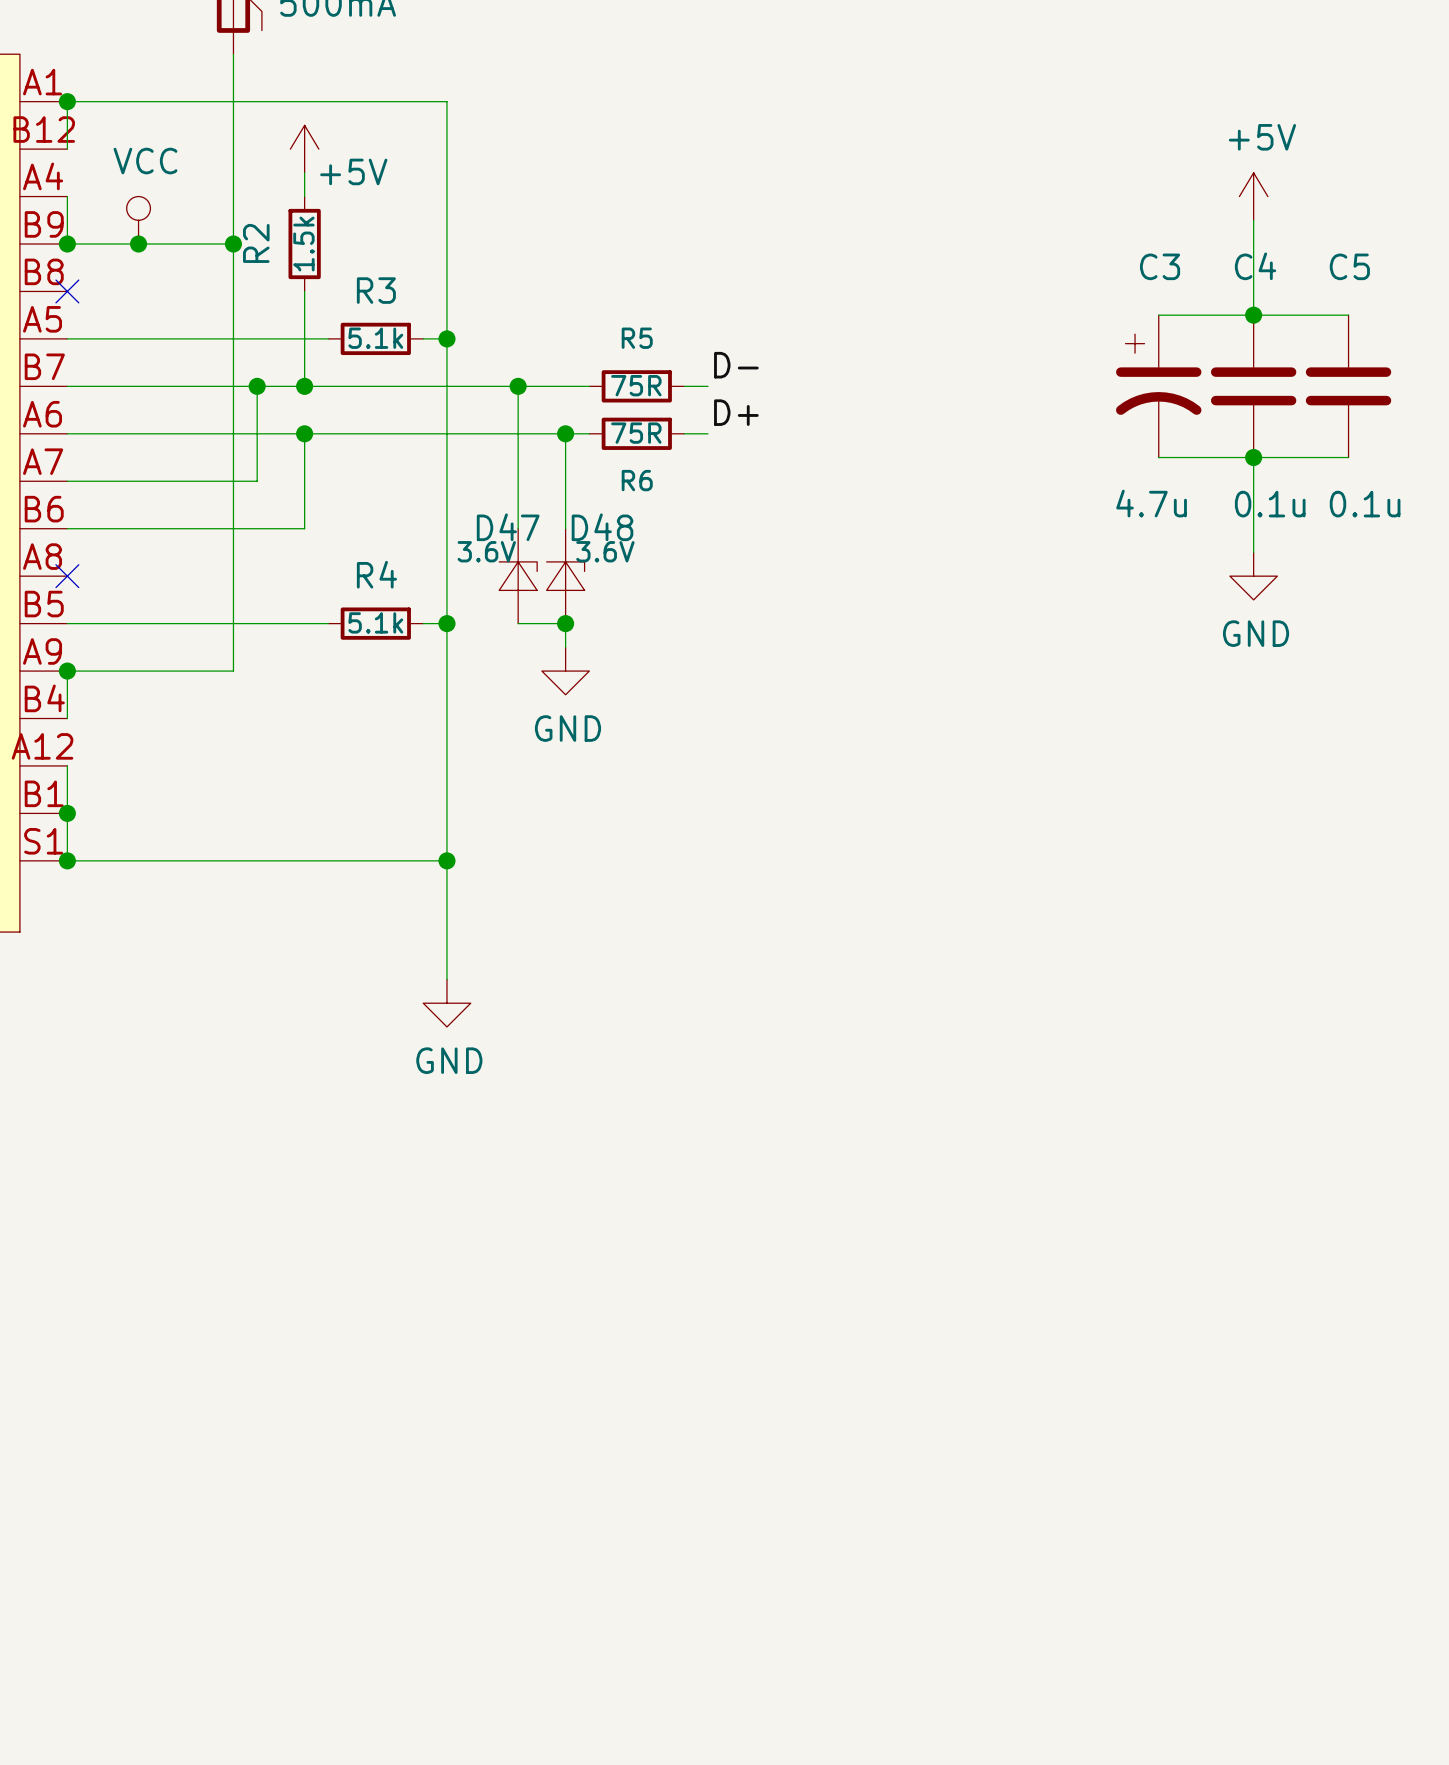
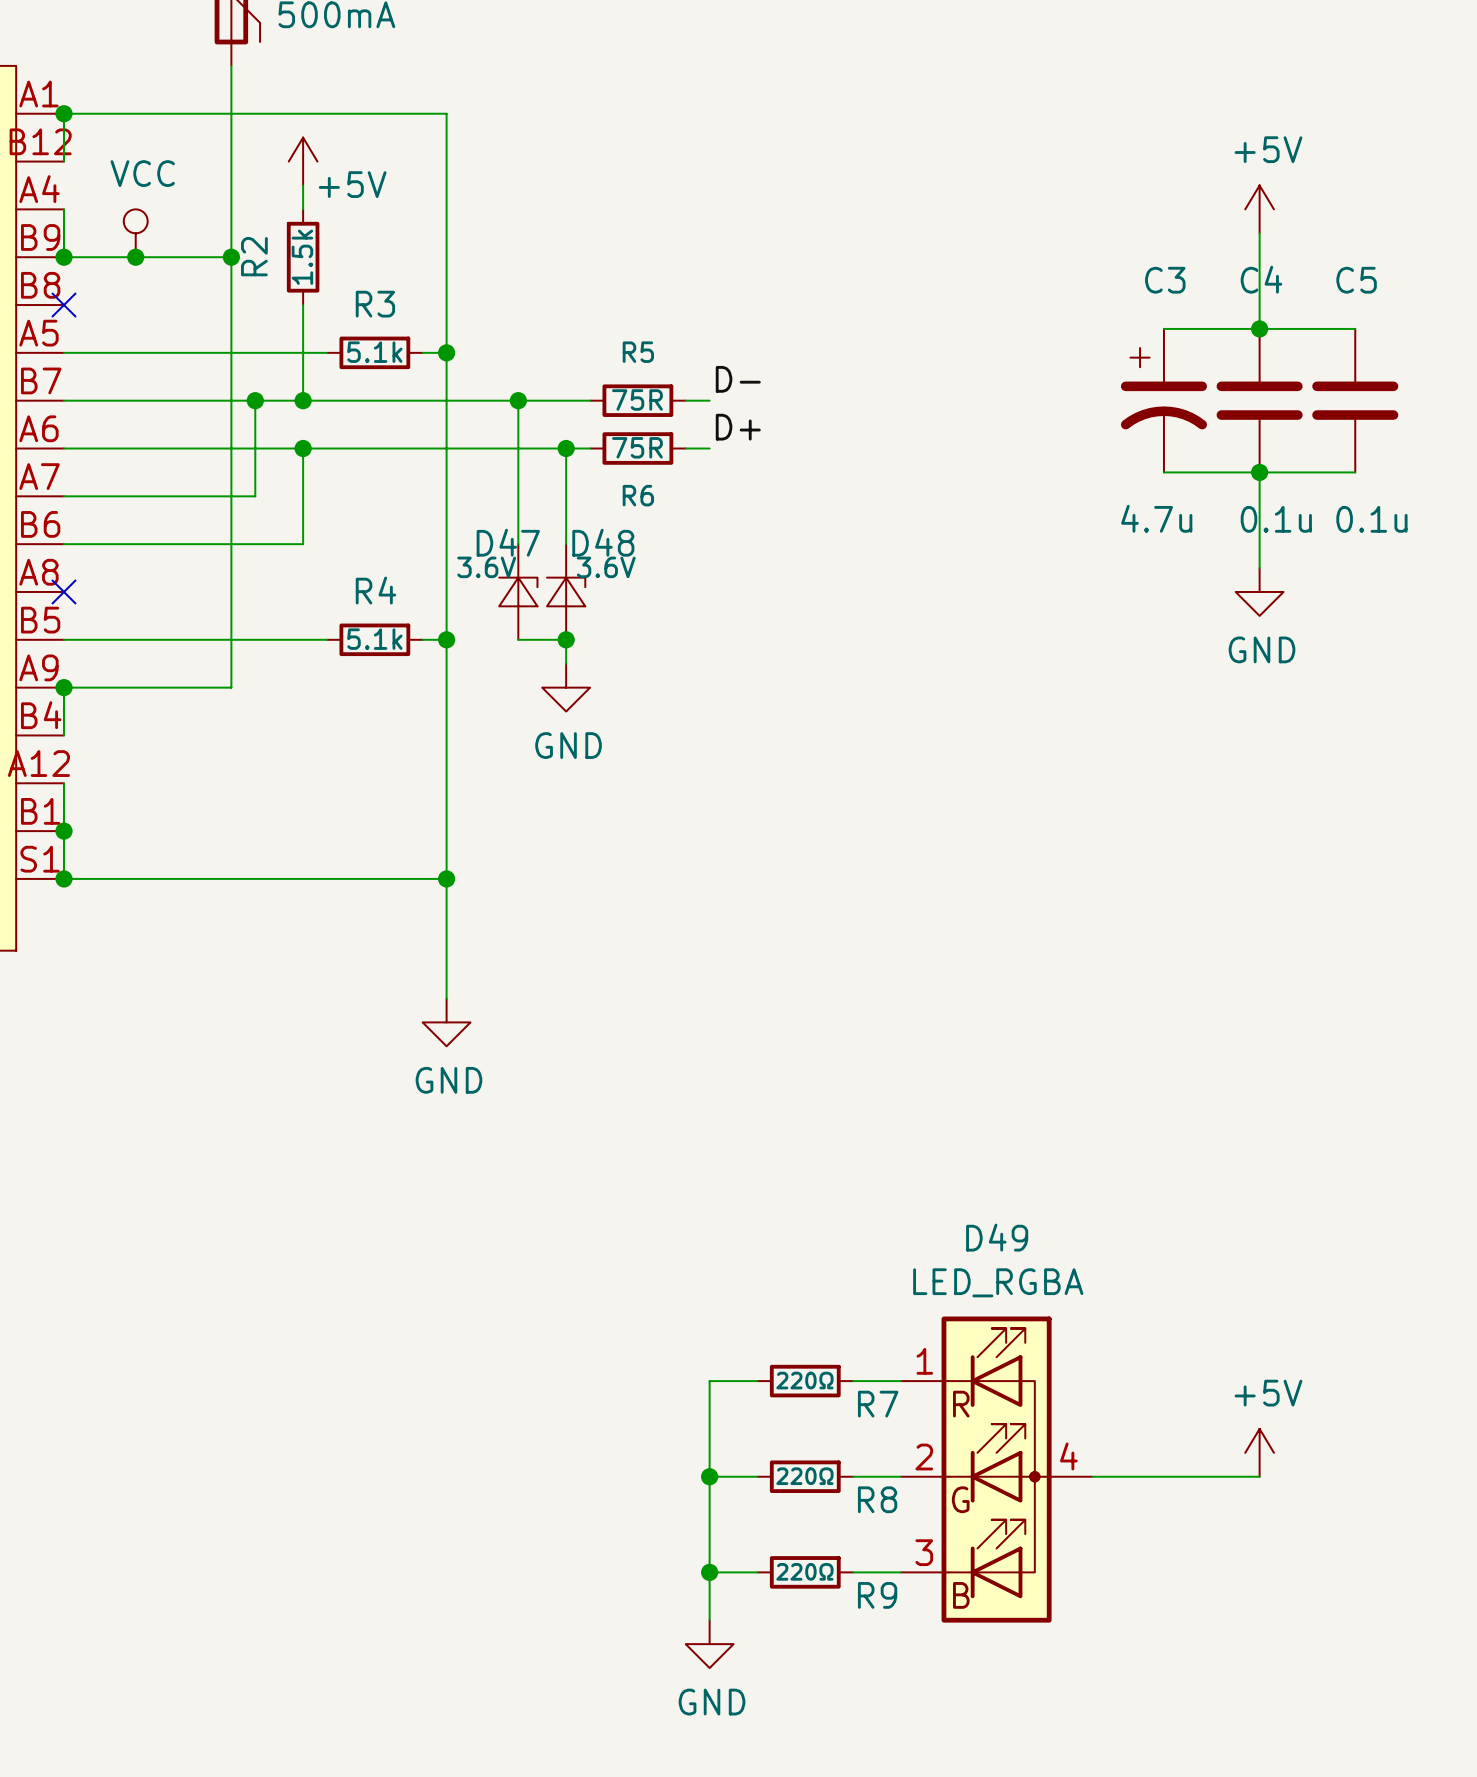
wire: none -> (757, 1381) (709, 1381) (709, 1620)
R7: none -> 220Ω (805, 1381)
wire: none -> (853, 1381) (900, 1381)
power symbol: none -> +5V (1259, 1452)
D49: none -> LED_RGBA (996, 1469)
wire: none -> (709, 1476) (757, 1476)
junction: none -> (709, 1476)
R8: none -> 220Ω (805, 1476)
wire: none -> (853, 1476) (900, 1476)
wire: none -> (1092, 1476) (1259, 1476)
wire: none -> (709, 1572) (757, 1572)
junction: none -> (709, 1572)
R9: none -> 220Ω (805, 1572)
wire: none -> (853, 1572) (900, 1572)
power symbol: none -> GND (709, 1644)

